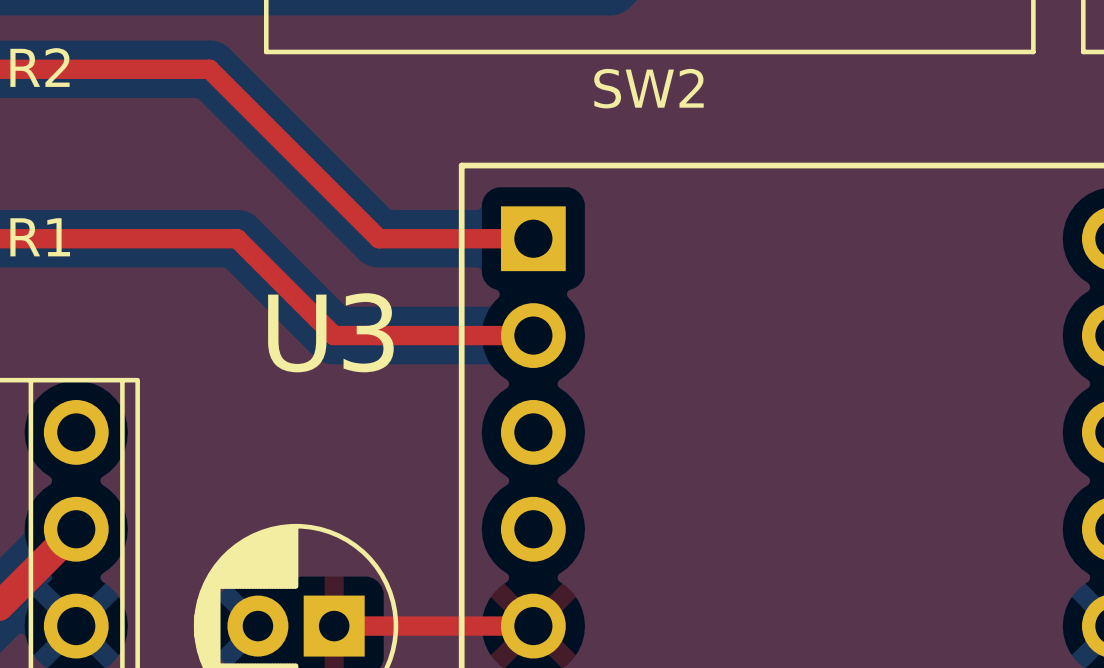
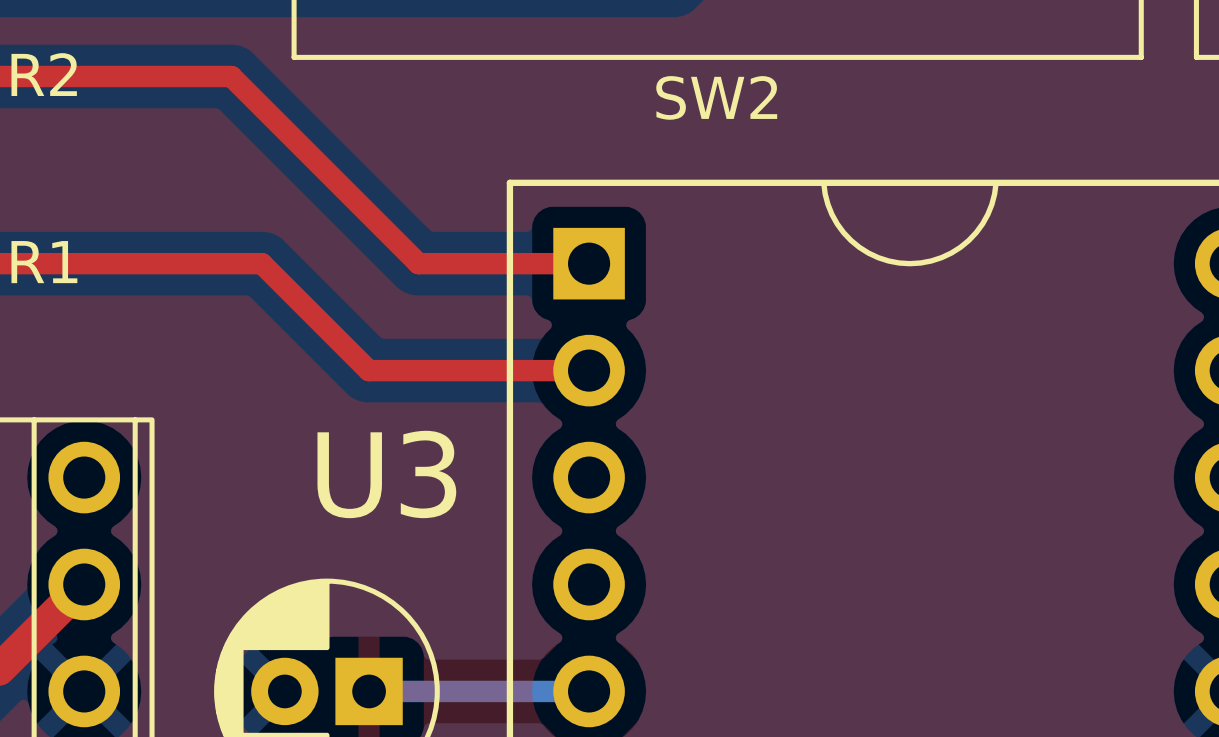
line: none -> (823, 183) (831, 214) (851, 240) (878, 257) (909, 263) (941, 257) (968, 240) (987, 214) (996, 183)
U3 name position: U3 (330, 332) -> U3 (386, 474)
top track: (334, 626) (533, 626) -> none
bottom track: none -> (369, 691) (589, 691)

